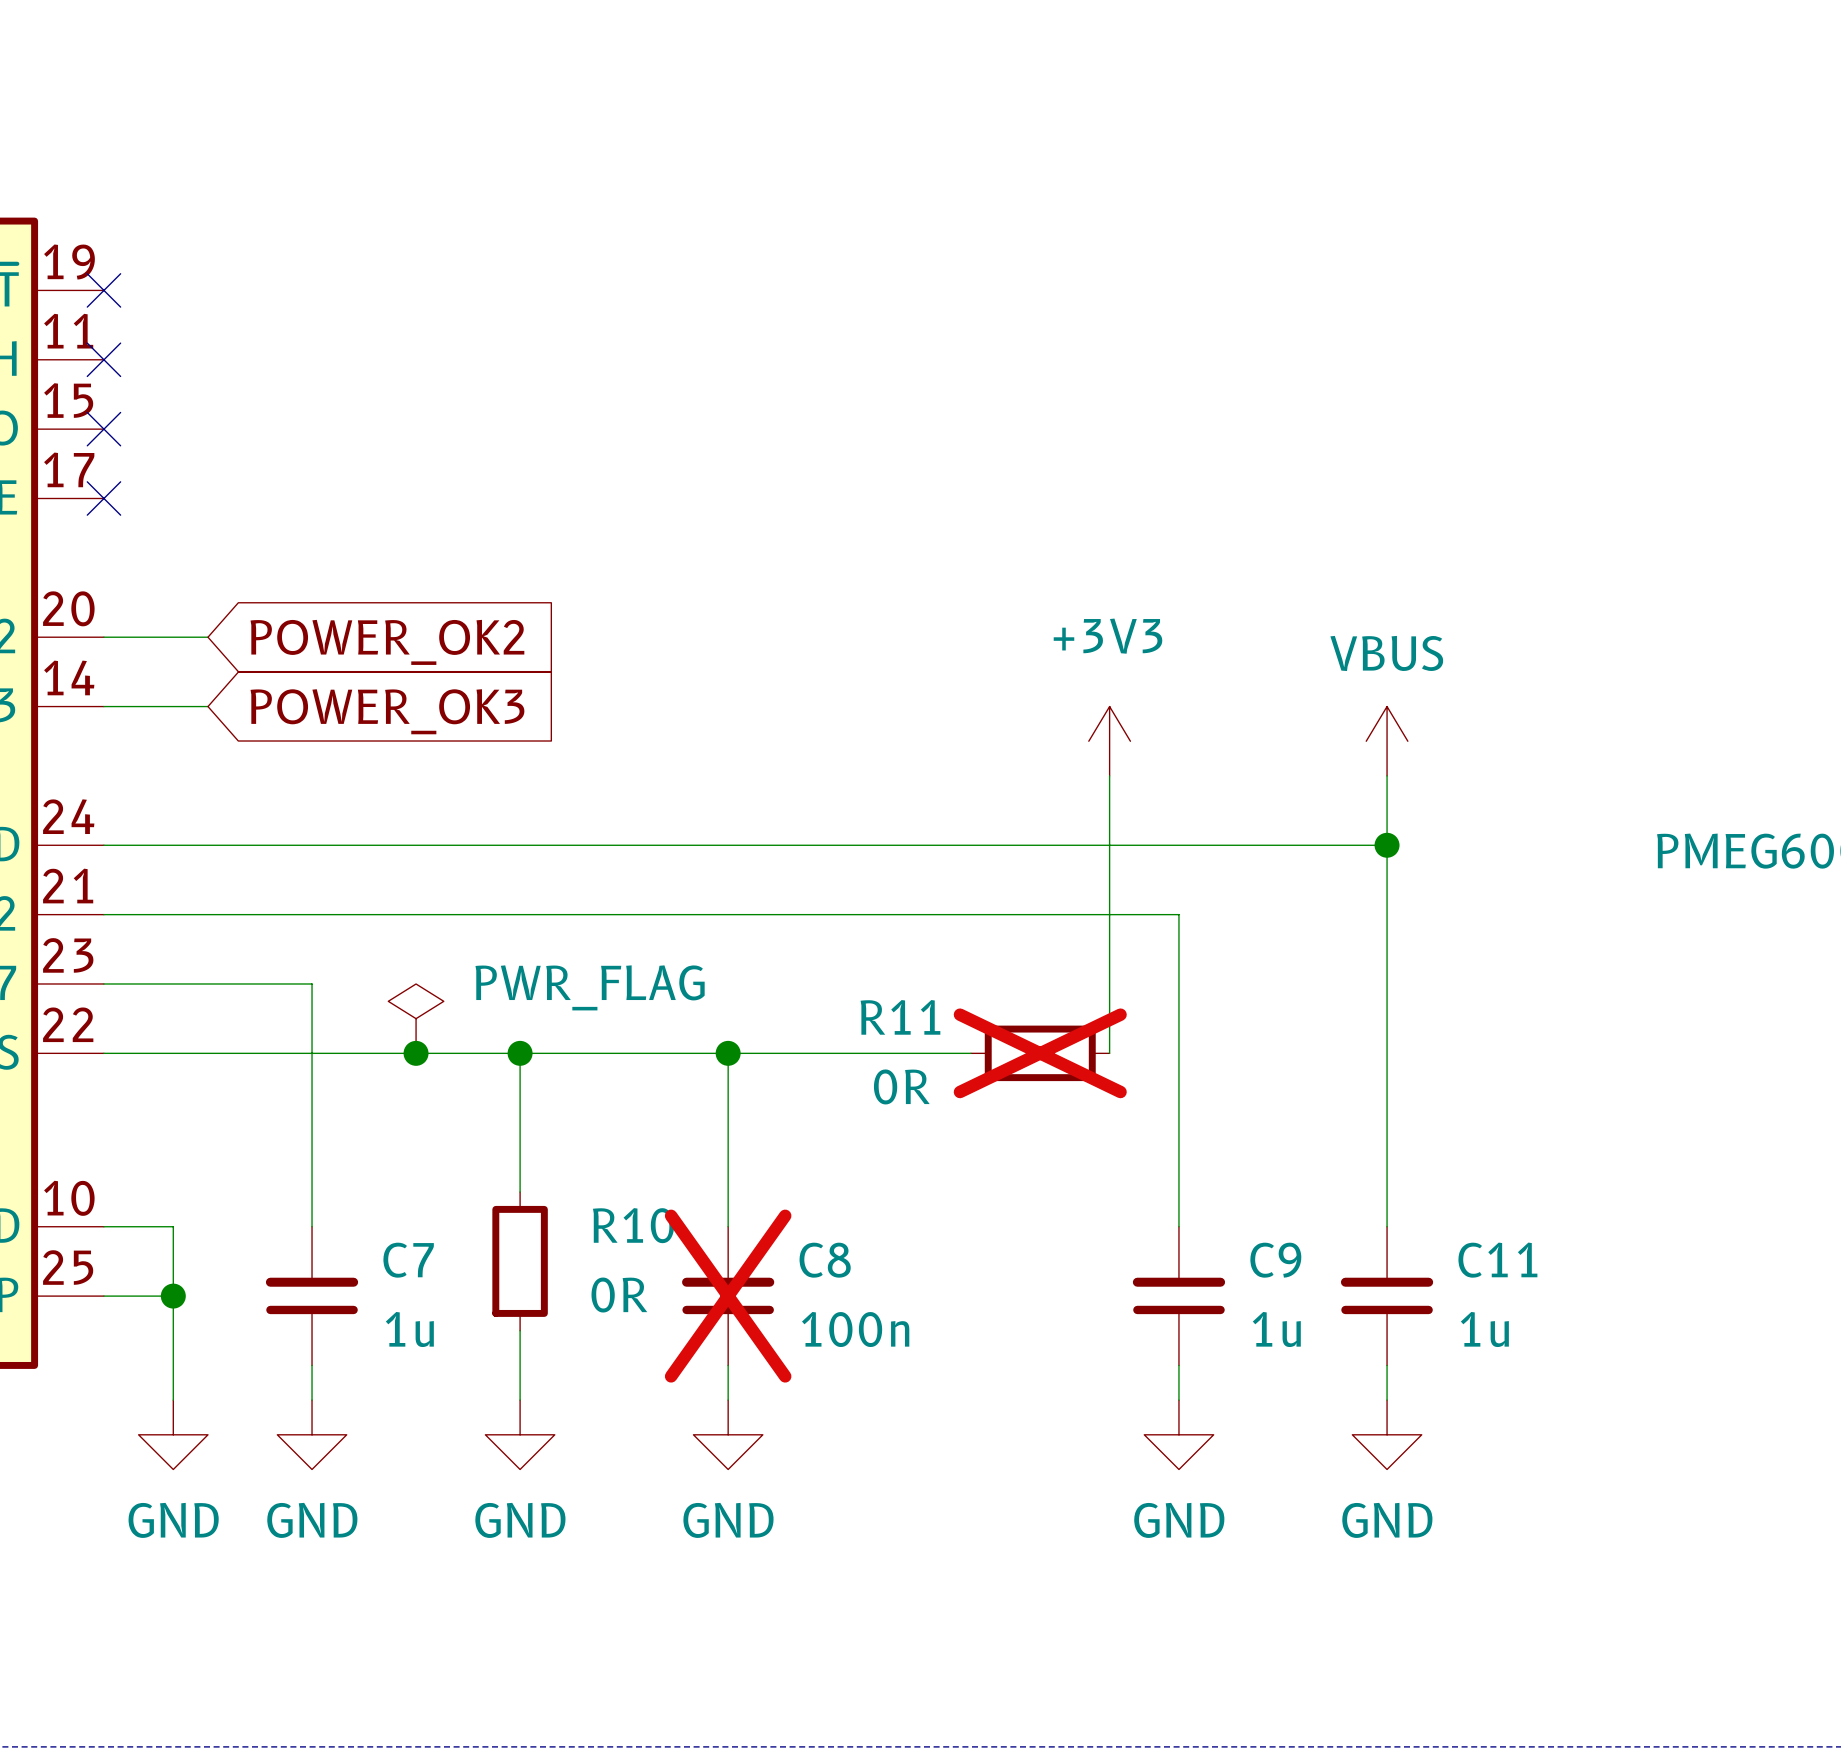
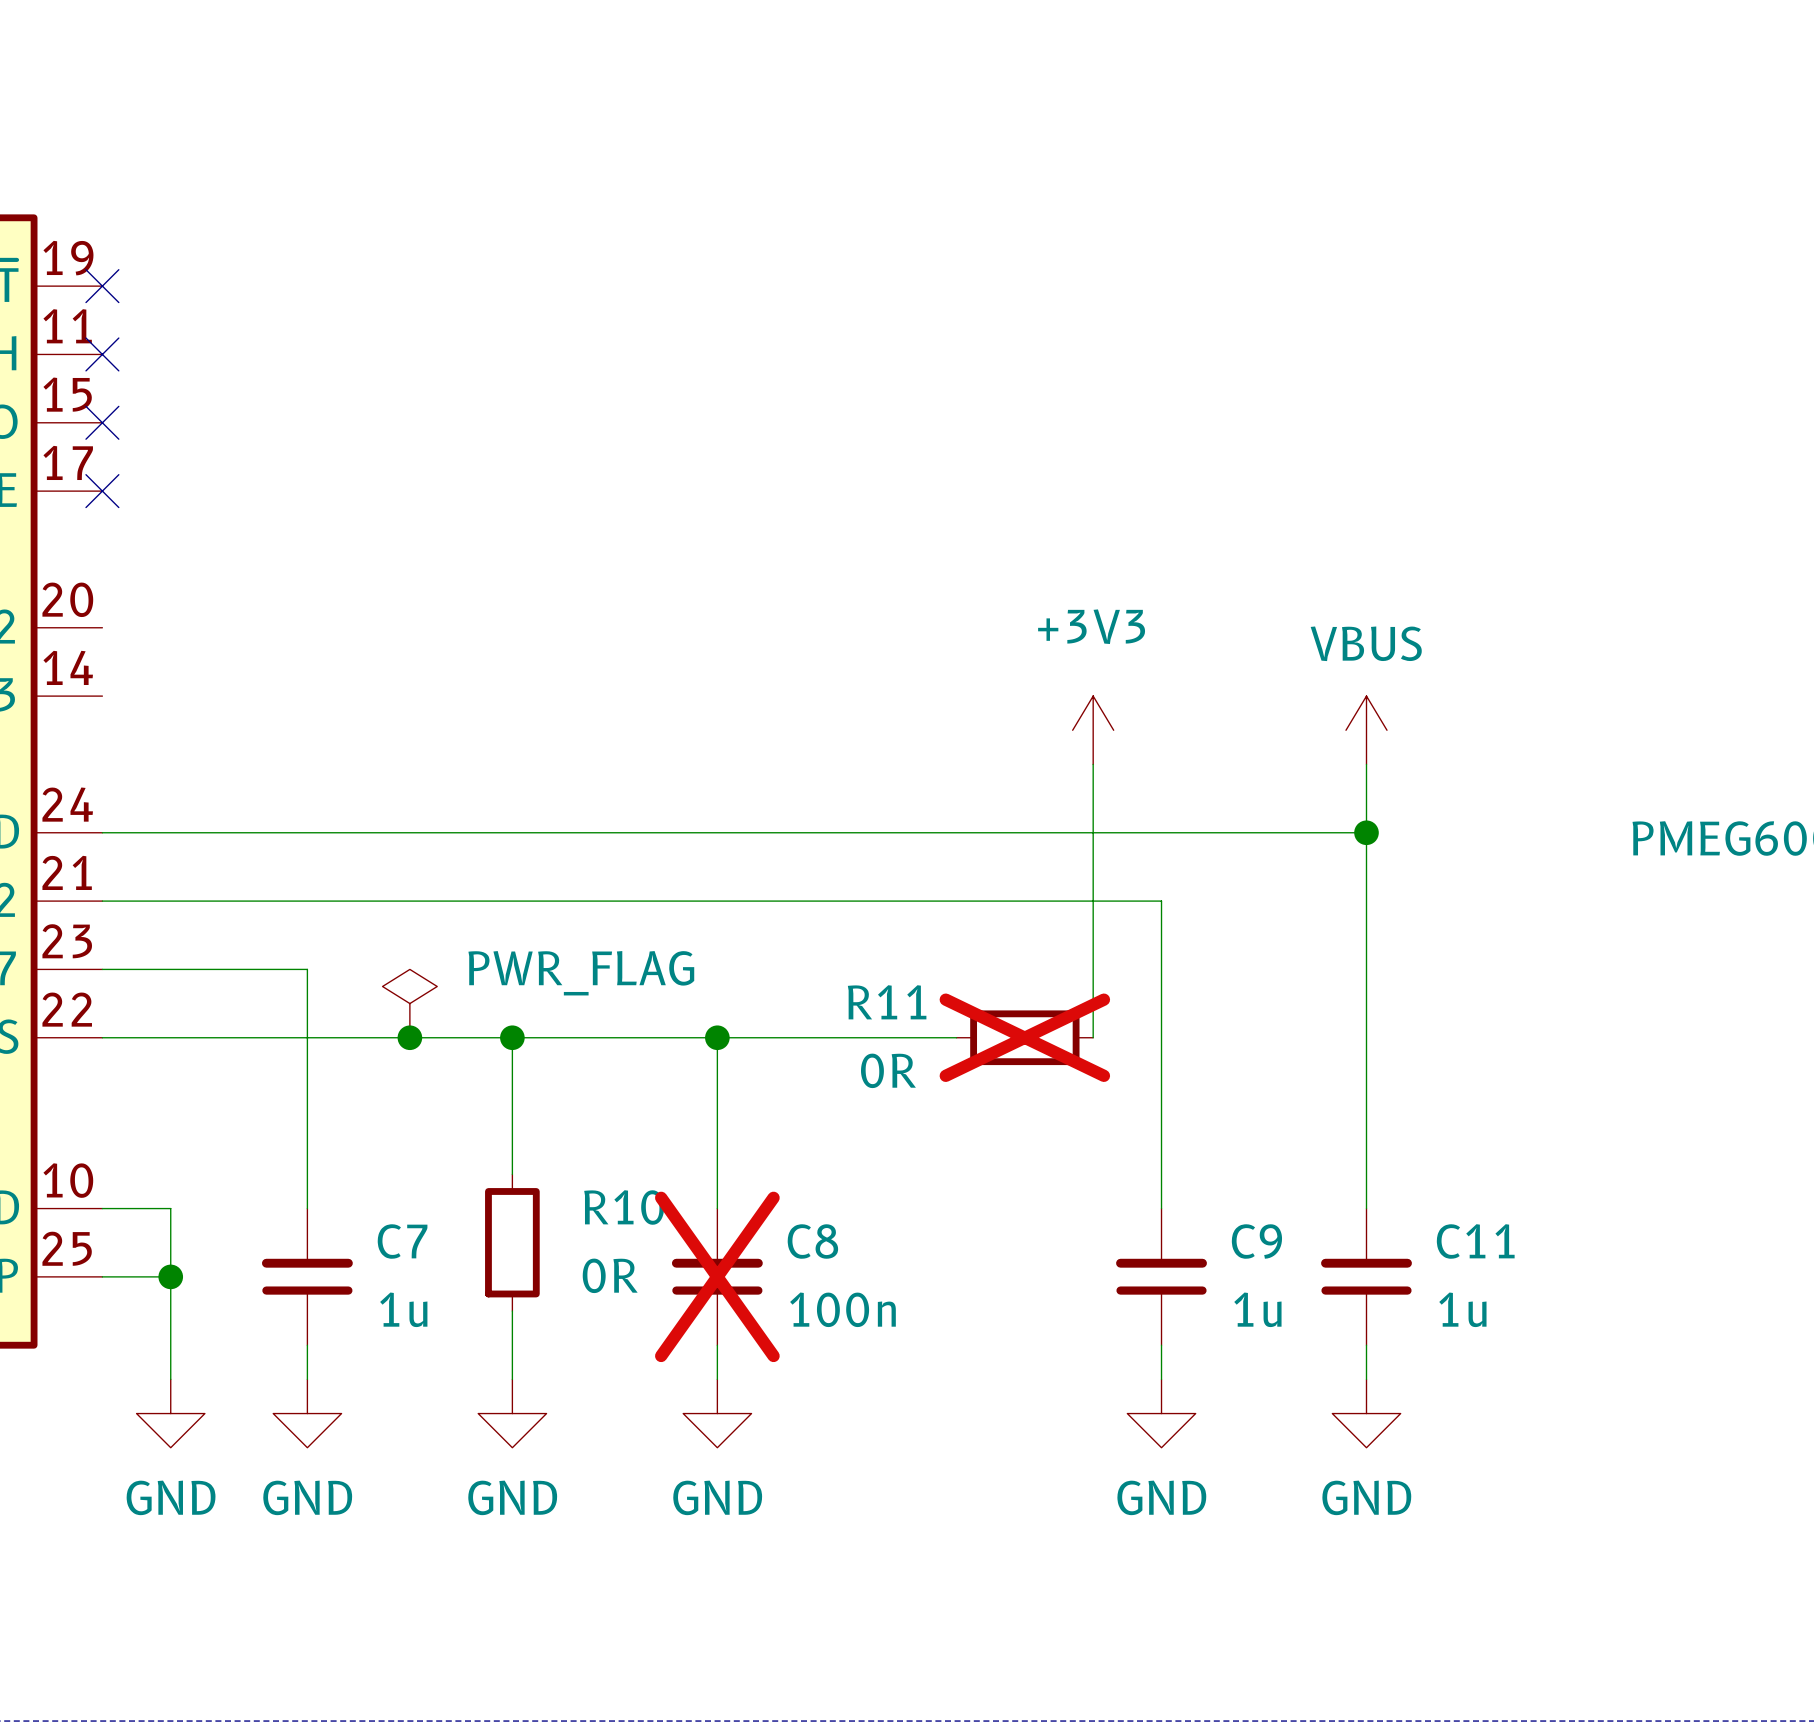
wire: (103, 637) (207, 637) -> none
global label: POWER_OK2 (387, 642) -> none
wire: (103, 706) (207, 706) -> none
global label: POWER_OK3 (387, 711) -> none

